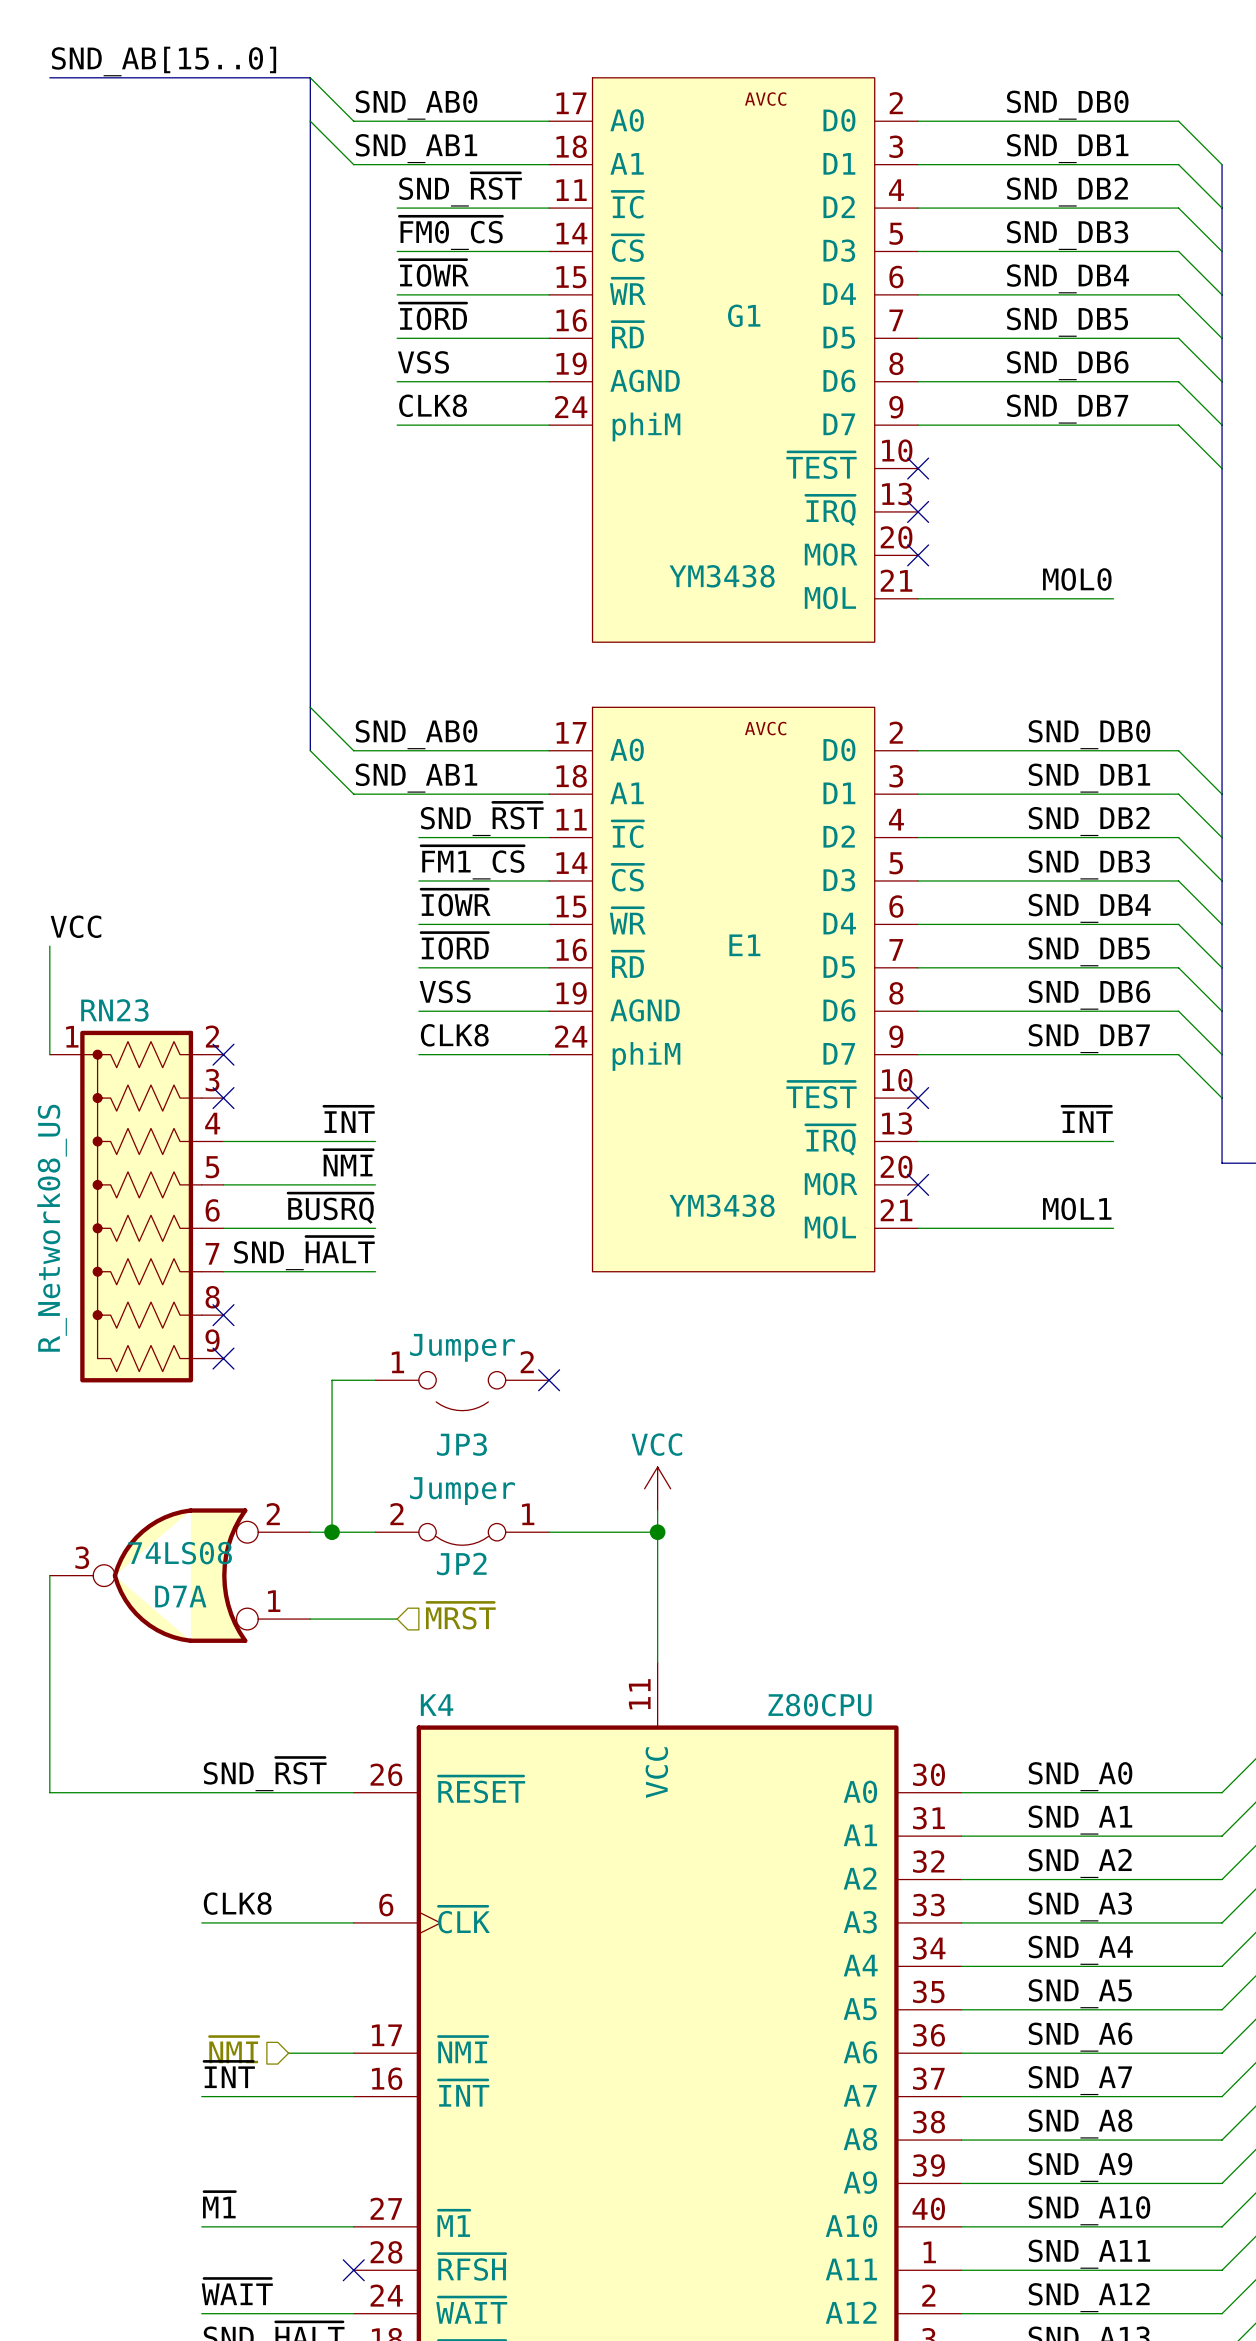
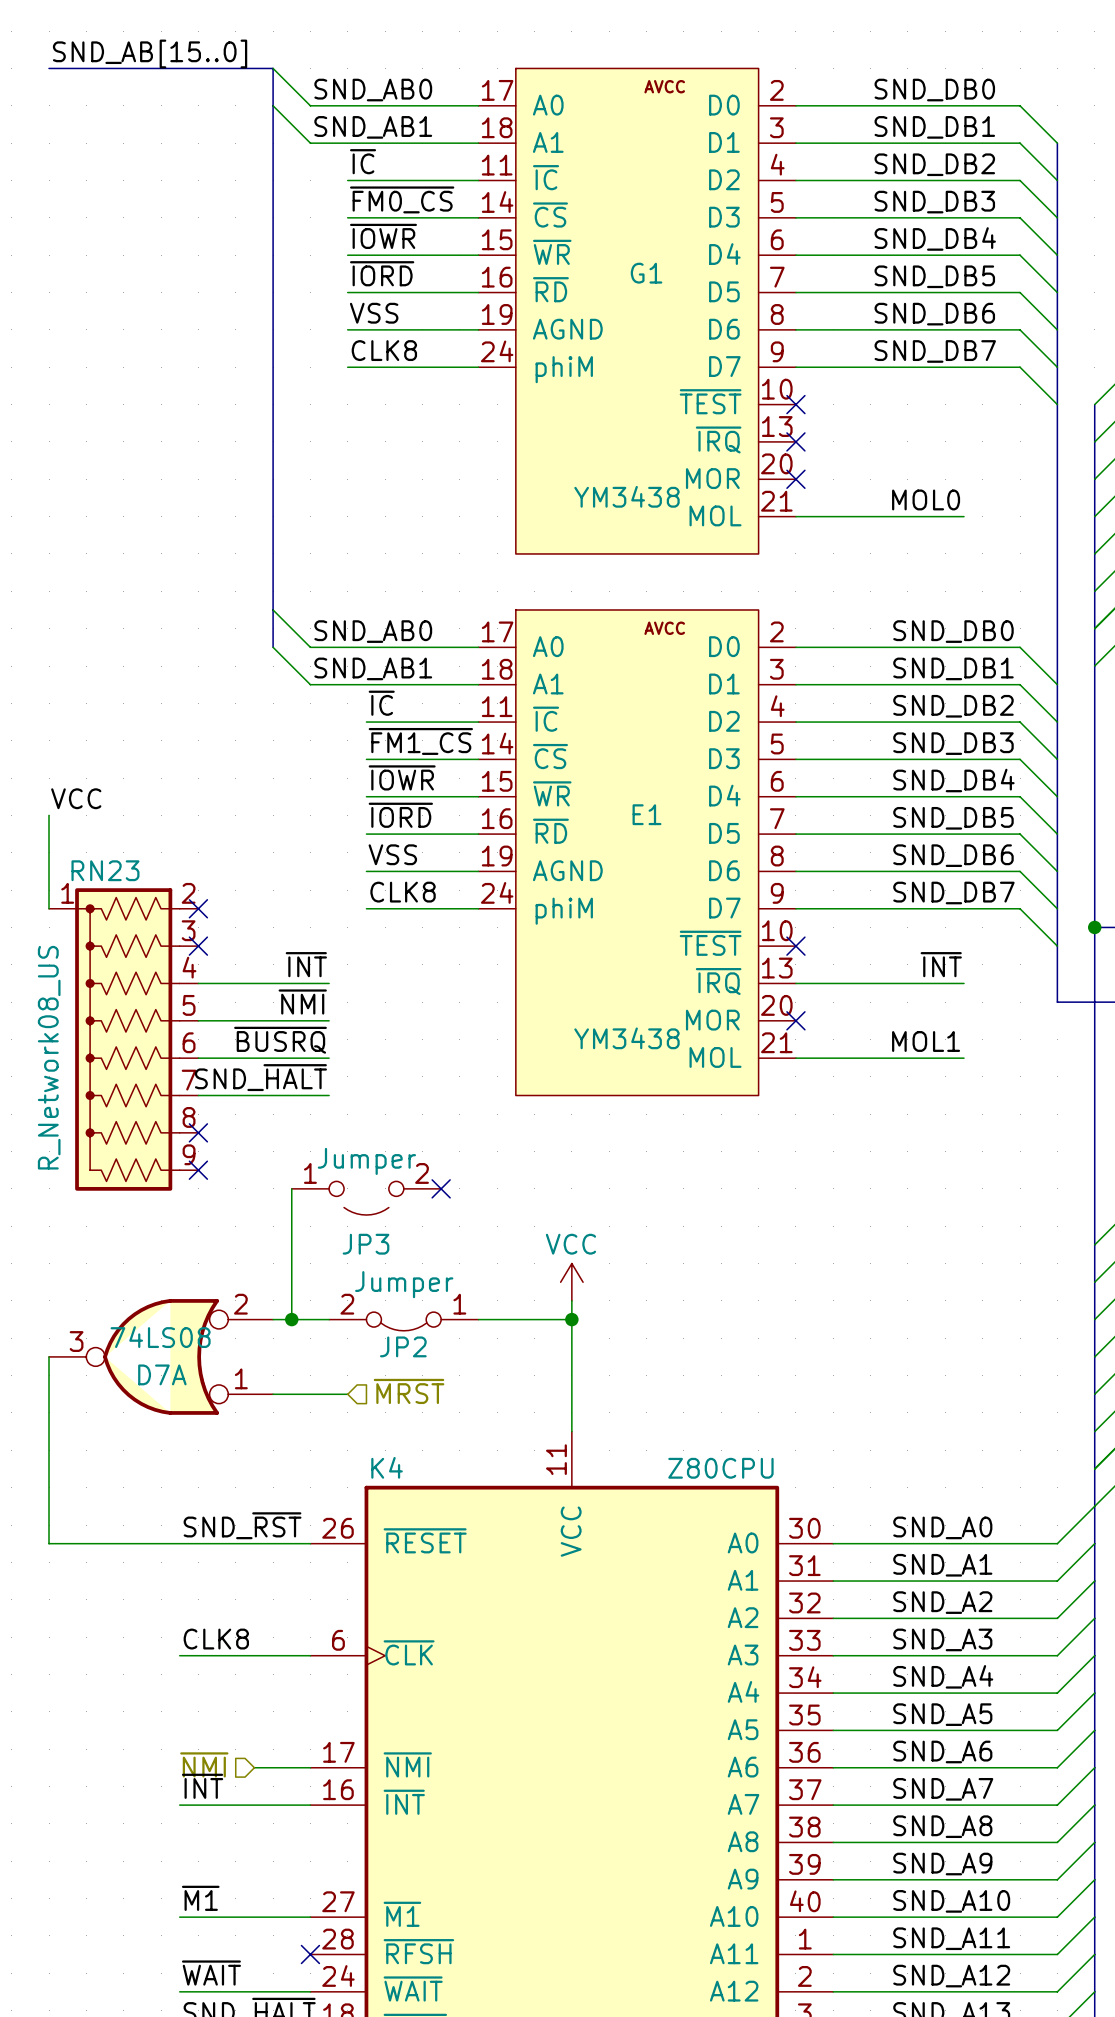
label: SND_~{RST} (460, 189) -> ~{IC} (363, 161)
label: SND_~{RST} (482, 819) -> ~{IC} (381, 703)
no-connect mark position: (549, 1380) -> (441, 1188)
JP3 position: (462, 1391) -> (366, 1198)

